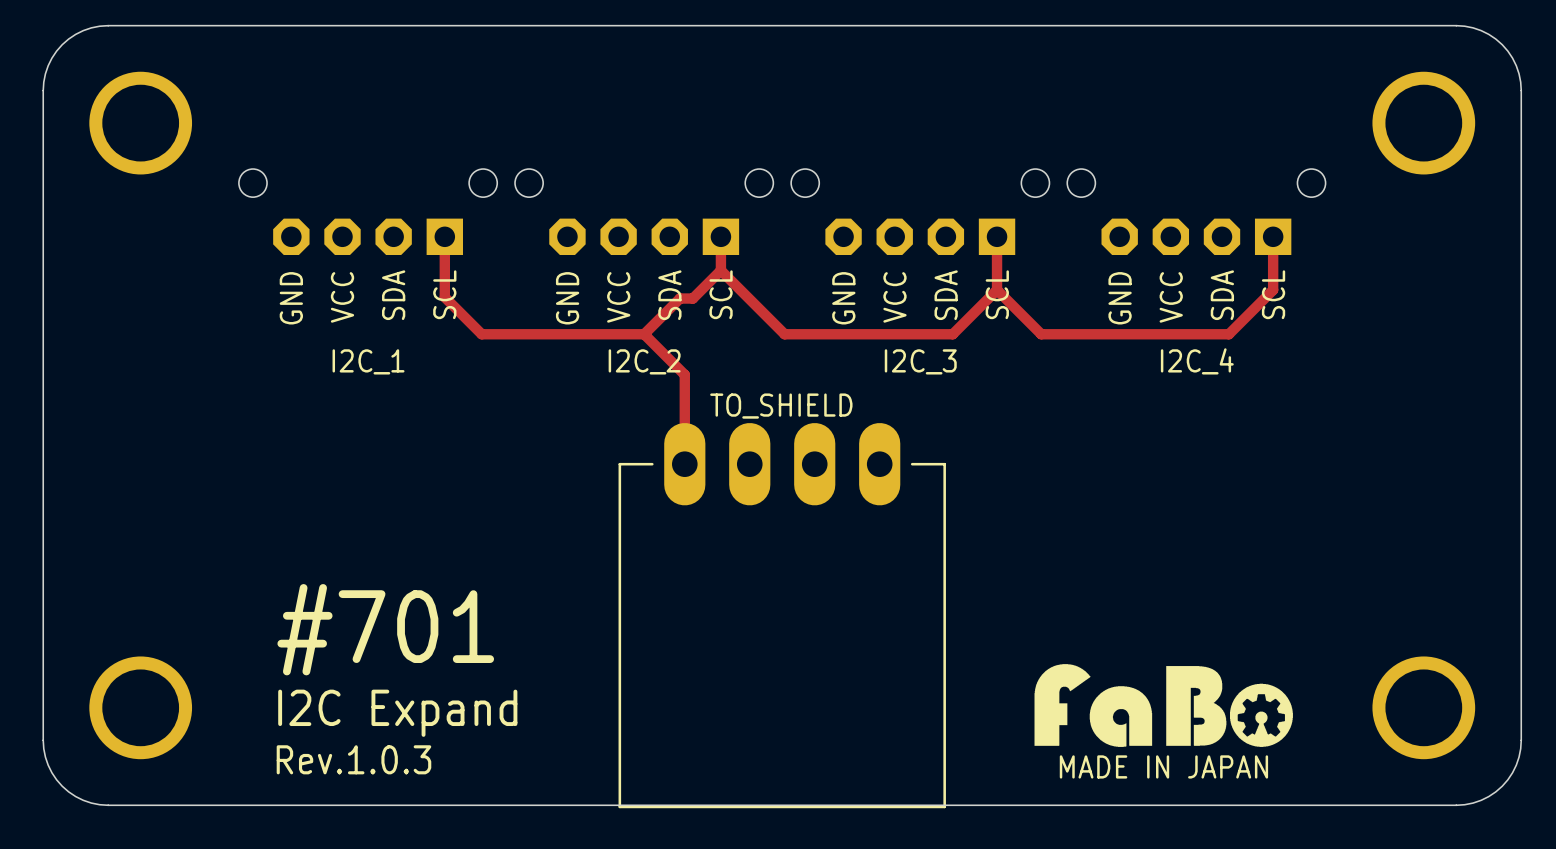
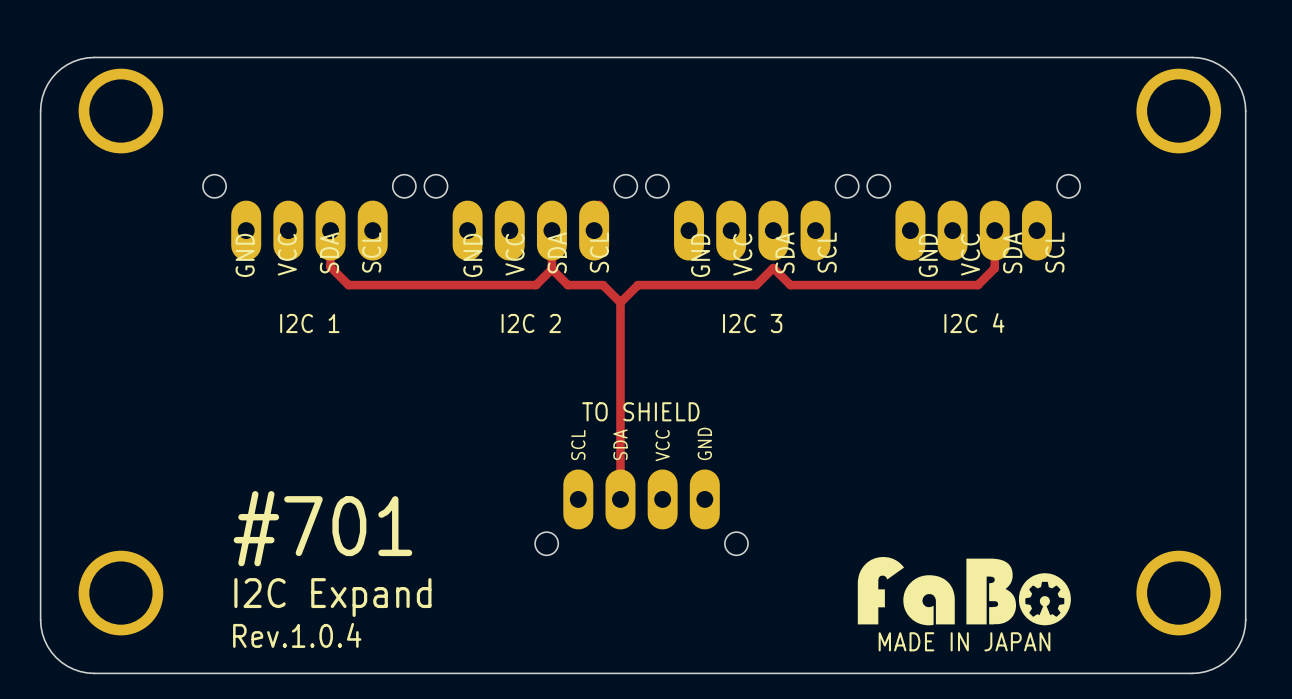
board edge: (43, 123) (43, 82) (51, 58) (62, 44) (75, 34) (91, 27) (108, 25) (1456, 25) (1481, 30) (1495, 39) (1507, 51) (1519, 73) (1521, 90) (1521, 740) (1516, 765) (1507, 779) (1495, 791) (1473, 803) (1440, 805) -> (40, 111) (44, 90) (56, 73) (73, 61) (94, 57) (1192, 57) (1212, 61) (1224, 68) (1234, 78) (1243, 97) (1245, 111) (1245, 619) (1241, 640) (1230, 657) (1212, 669) (1192, 673)
I2C_1: (368, 212) -> none
I2C_2: (644, 212) -> none
I2C_3: (920, 212) -> none
I2C_4: (1196, 212) -> none
track: (444, 236) (444, 297) (481, 334) -> (330, 230) (330, 267) (348, 285) (402, 285)
track: (997, 236) (997, 290) -> none
track: (1273, 236) (1273, 290) (1228, 334) (1180, 334) -> (994, 230) (994, 268) (977, 285)
part: none -> (309, 217)
part: none -> (530, 217)
part: none -> (752, 217)
part: none -> (973, 217)
track: none -> (551, 230) (551, 269) (567, 285) (602, 285) (620, 302)
track: (997, 290) (952, 334) (911, 334) -> (863, 285) (790, 285) (773, 268) (756, 285)
track: (997, 290) (1041, 334) -> none
track: (663, 314) (679, 298) (692, 298) (720, 270) (784, 334) -> (620, 302) (637, 285) (651, 285)
track: (644, 334) (684, 374) (684, 464) -> none
track: none -> (620, 302) (620, 499)
text: none -> I2C 1 (309, 323)
text: none -> I2C 2 (531, 323)
text: none -> I2C 3 (752, 323)
text: none -> I2C 4 (974, 323)
text: none -> TO SHIELD (640, 411)
text: none -> GND (704, 443)
text: none -> SDA (620, 444)
text: none -> SCL (578, 444)
text: none -> VCC (662, 445)
part: none -> (641, 512)
TO_SHIELD: (782, 615) -> none
text: Rev.1.0.3 (353, 759) -> Rev.1.0.4 (297, 635)

